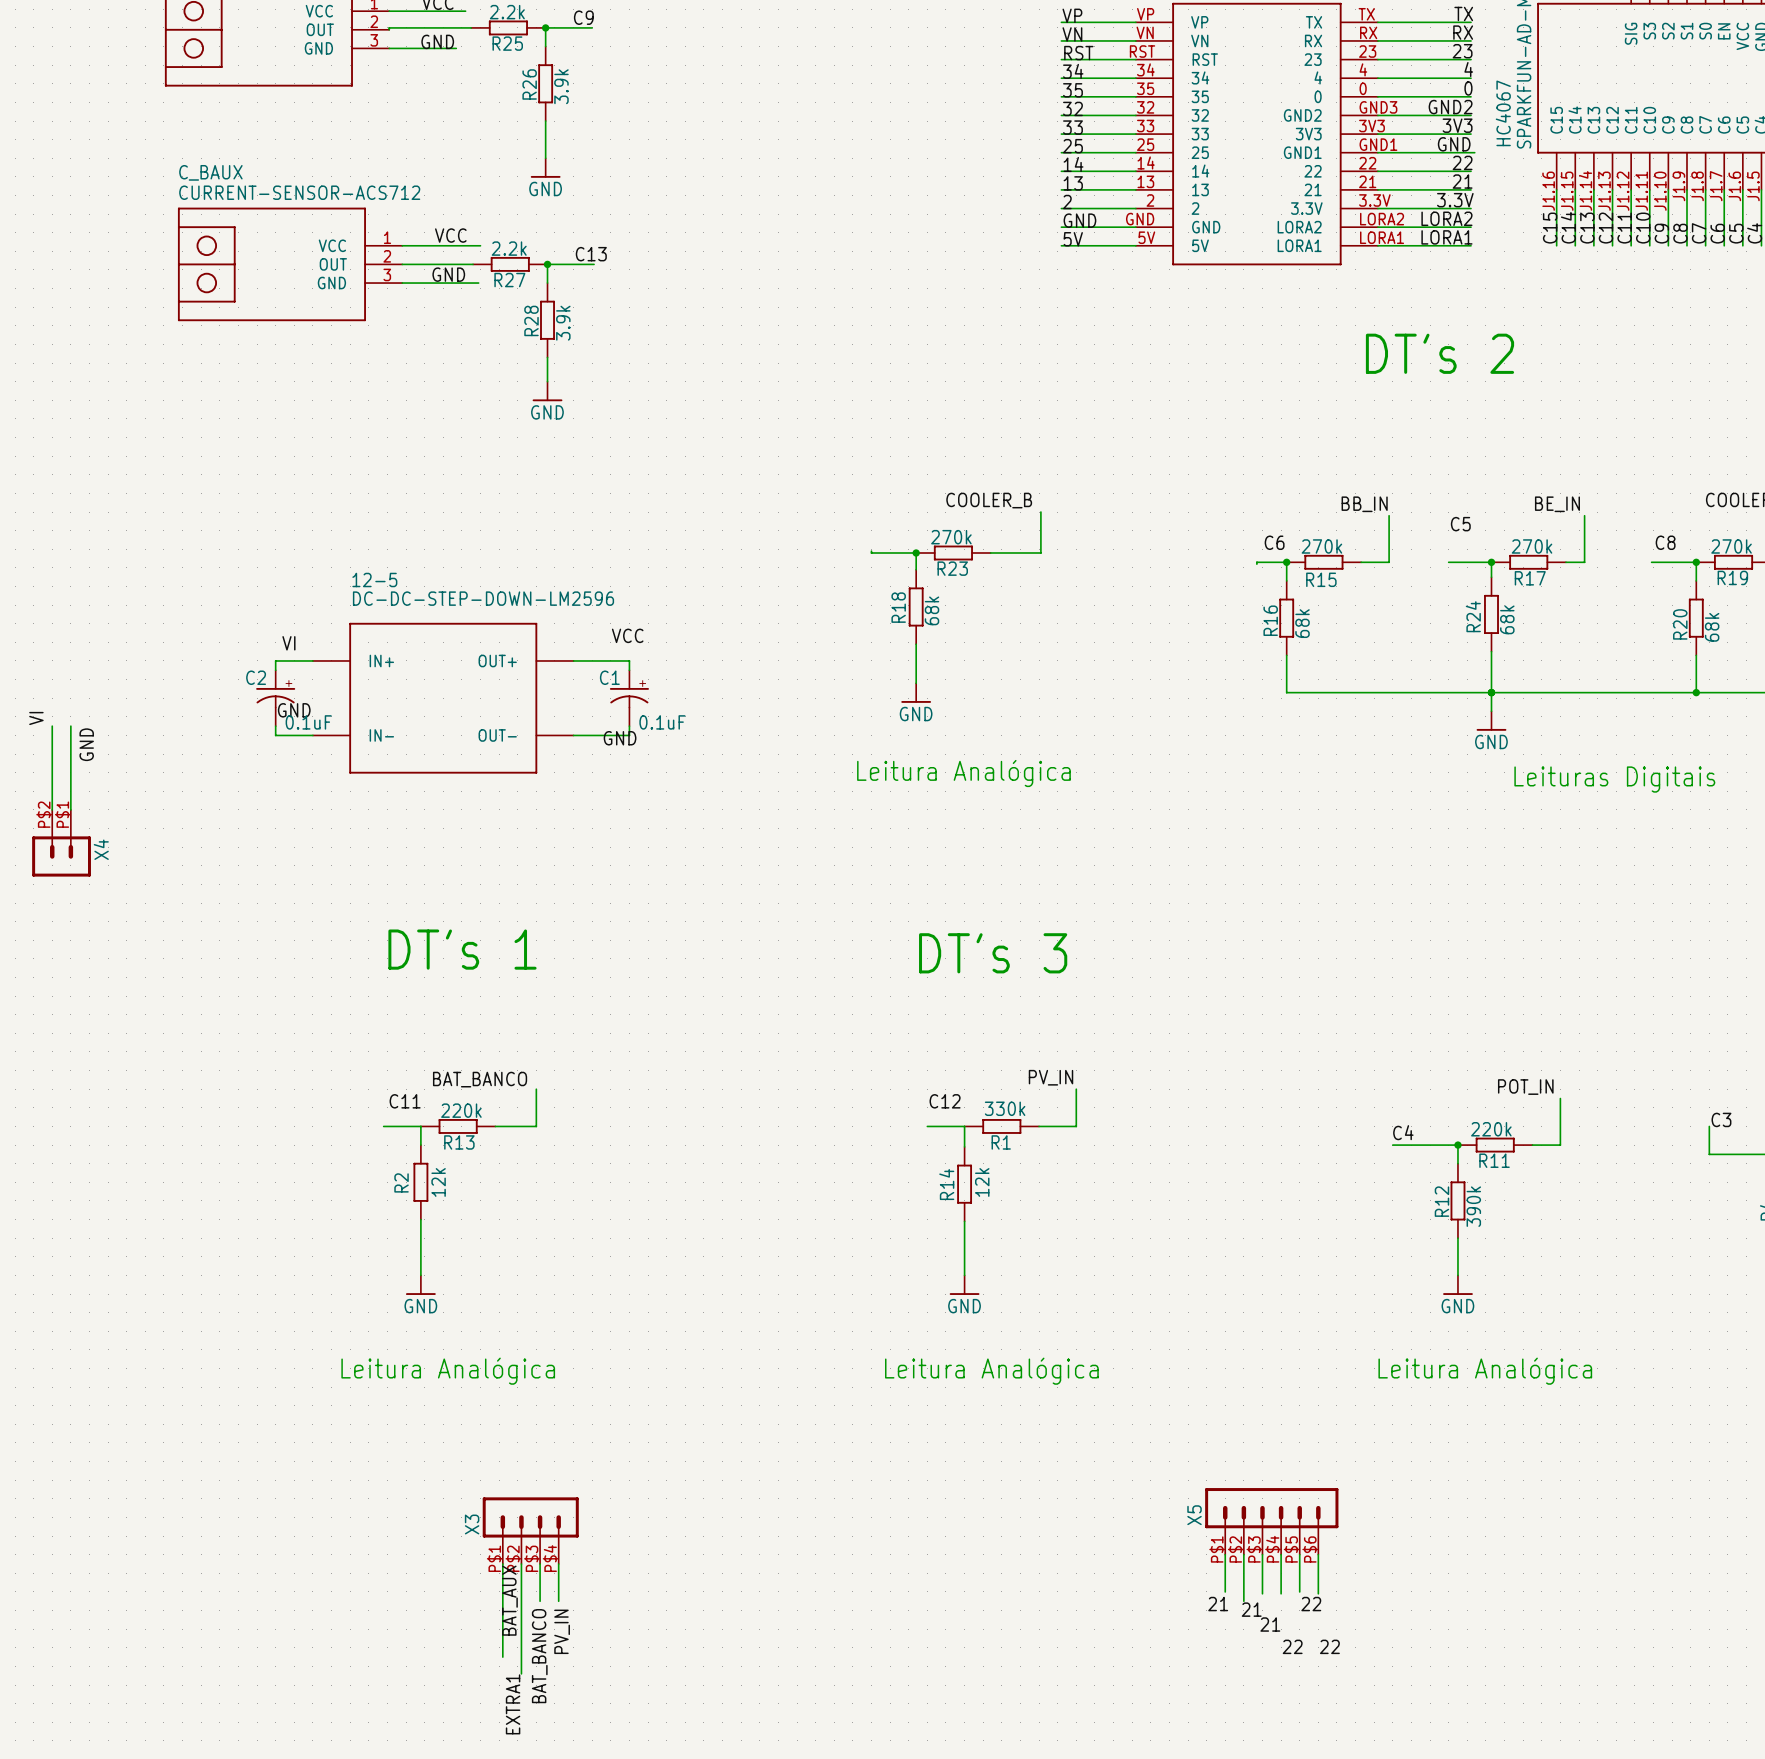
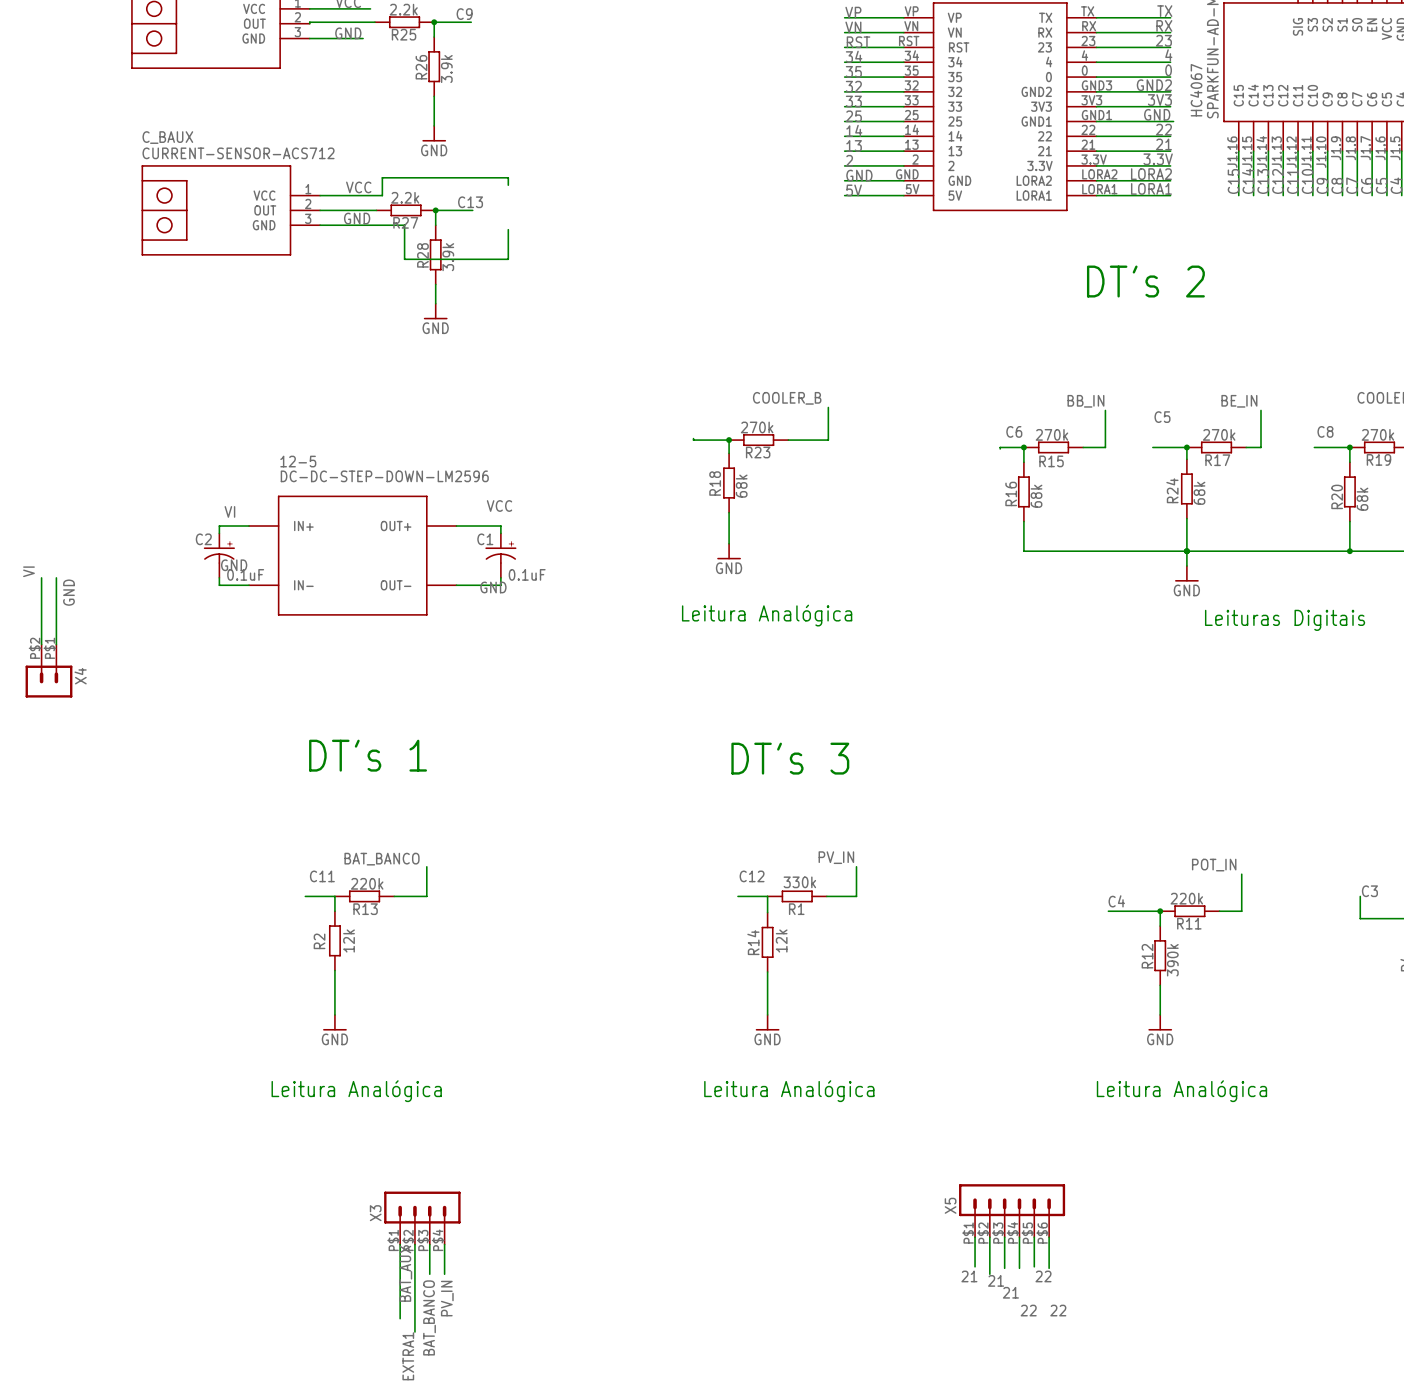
wire: none -> (508, 185) (508, 177) (382, 177) (382, 195)
wire: none -> (380, 225) (404, 225) (404, 259) (508, 259) (508, 229)

